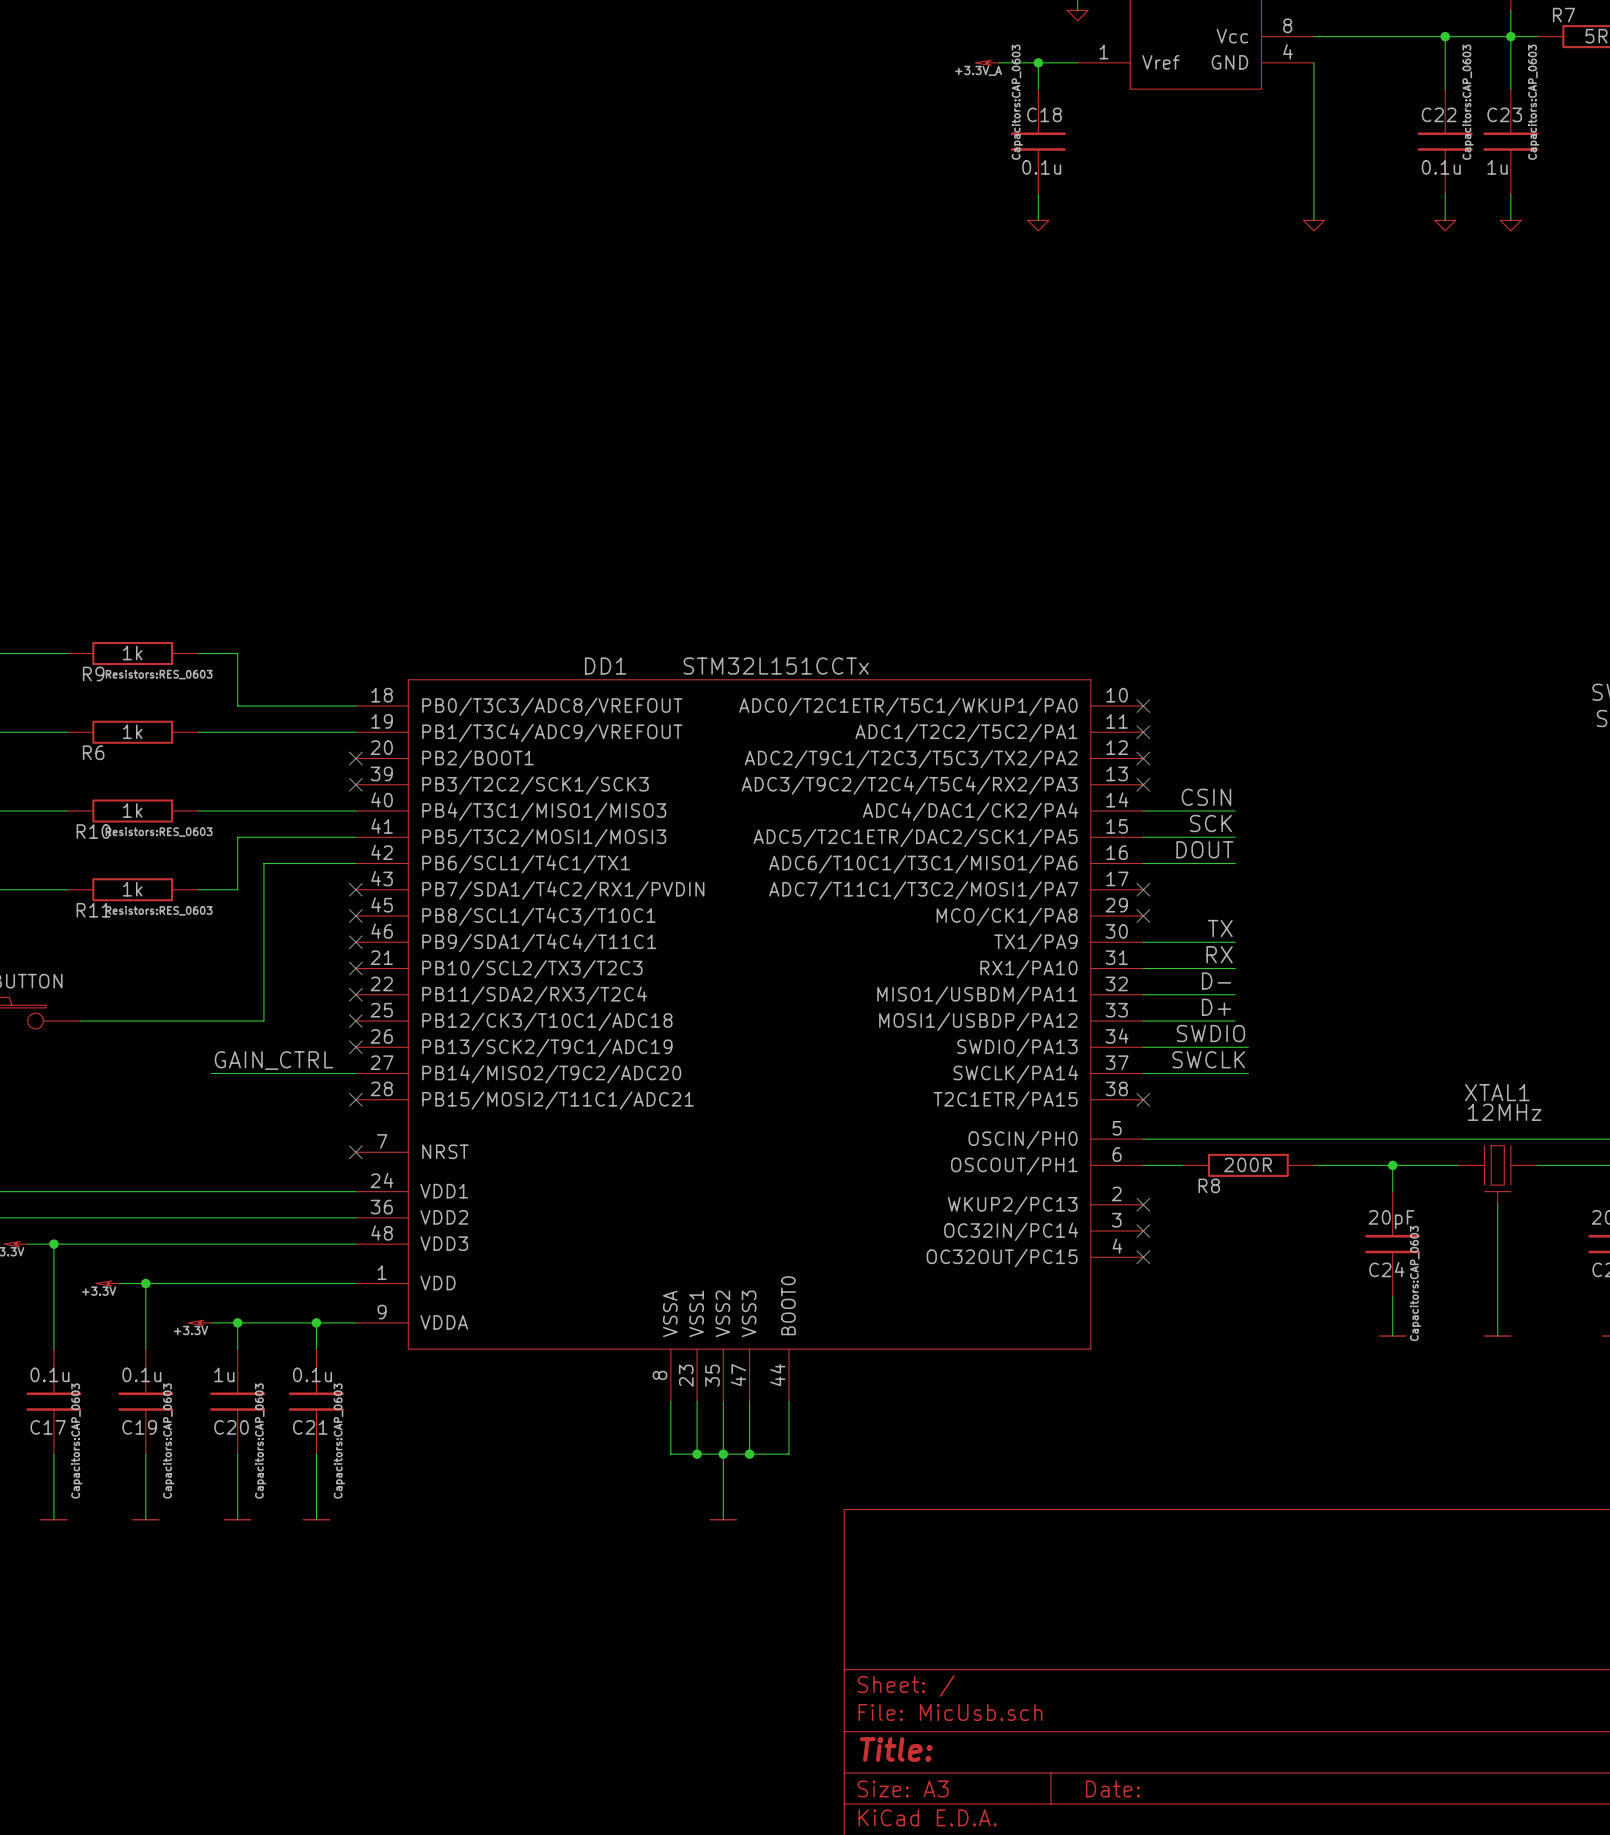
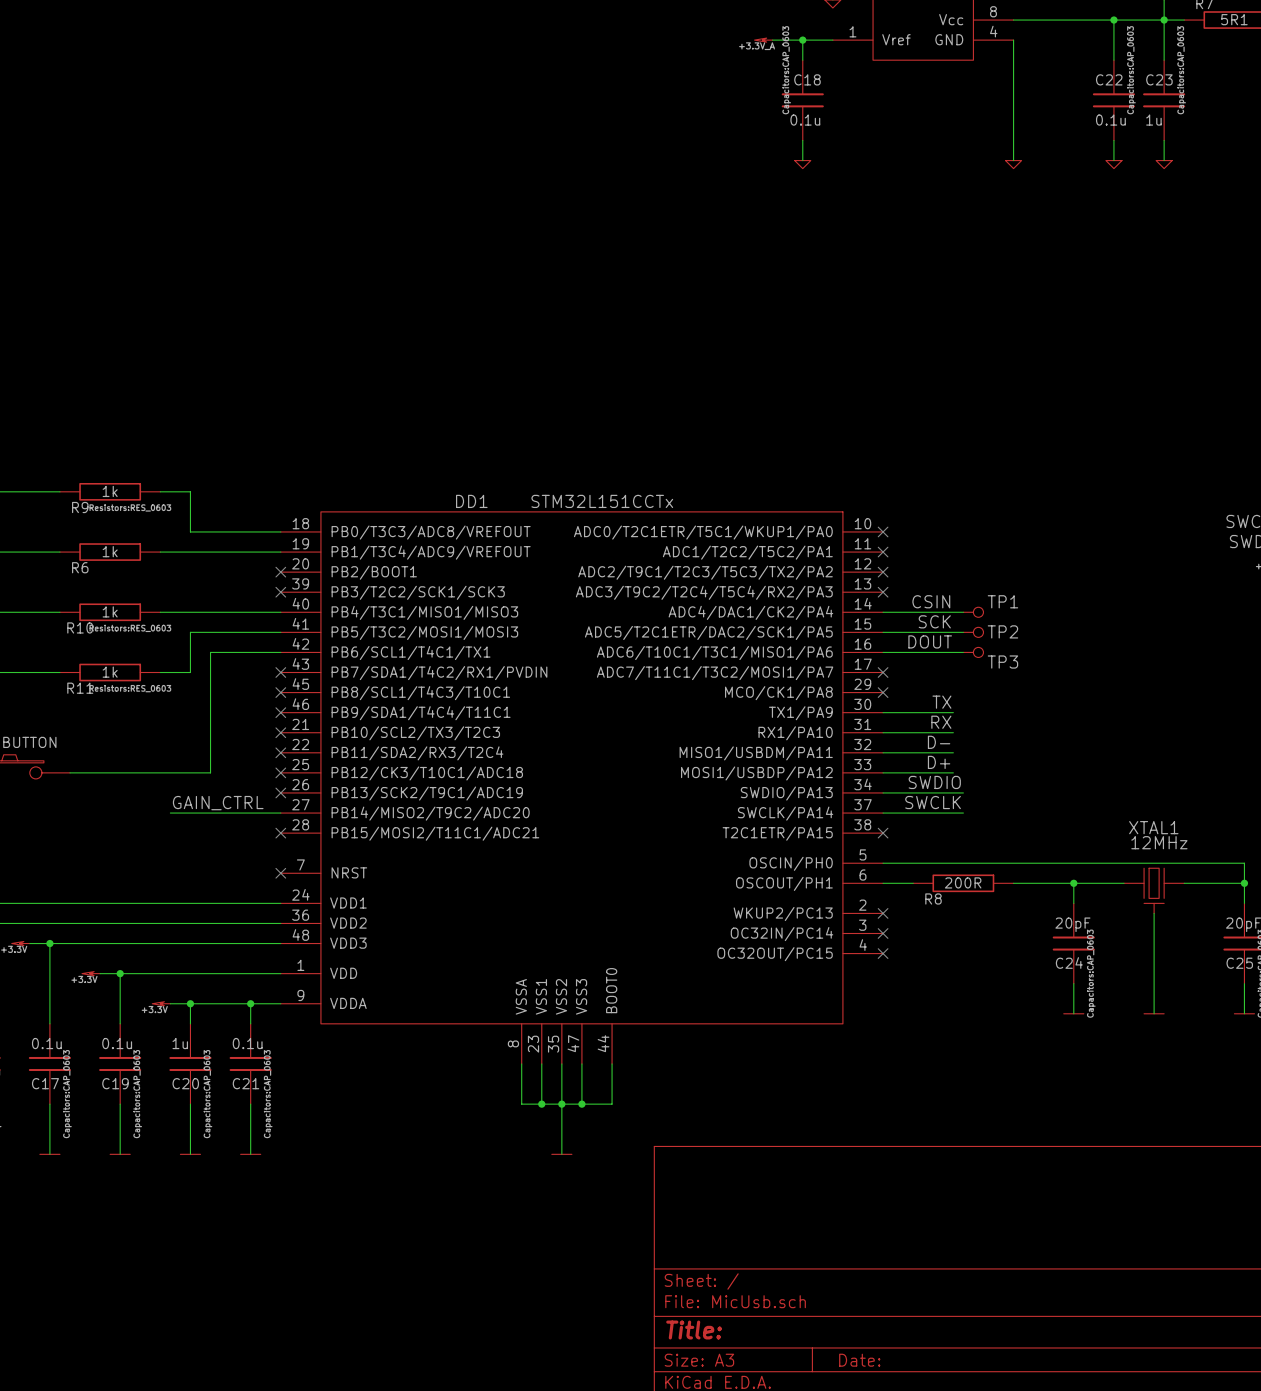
wire: none -> (953, 612) (963, 612)
TP1: none -> (973, 612)
wire: none -> (953, 632) (963, 632)
TP2: none -> (973, 632)
wire: none -> (953, 652) (963, 652)
TP3: none -> (973, 652)

